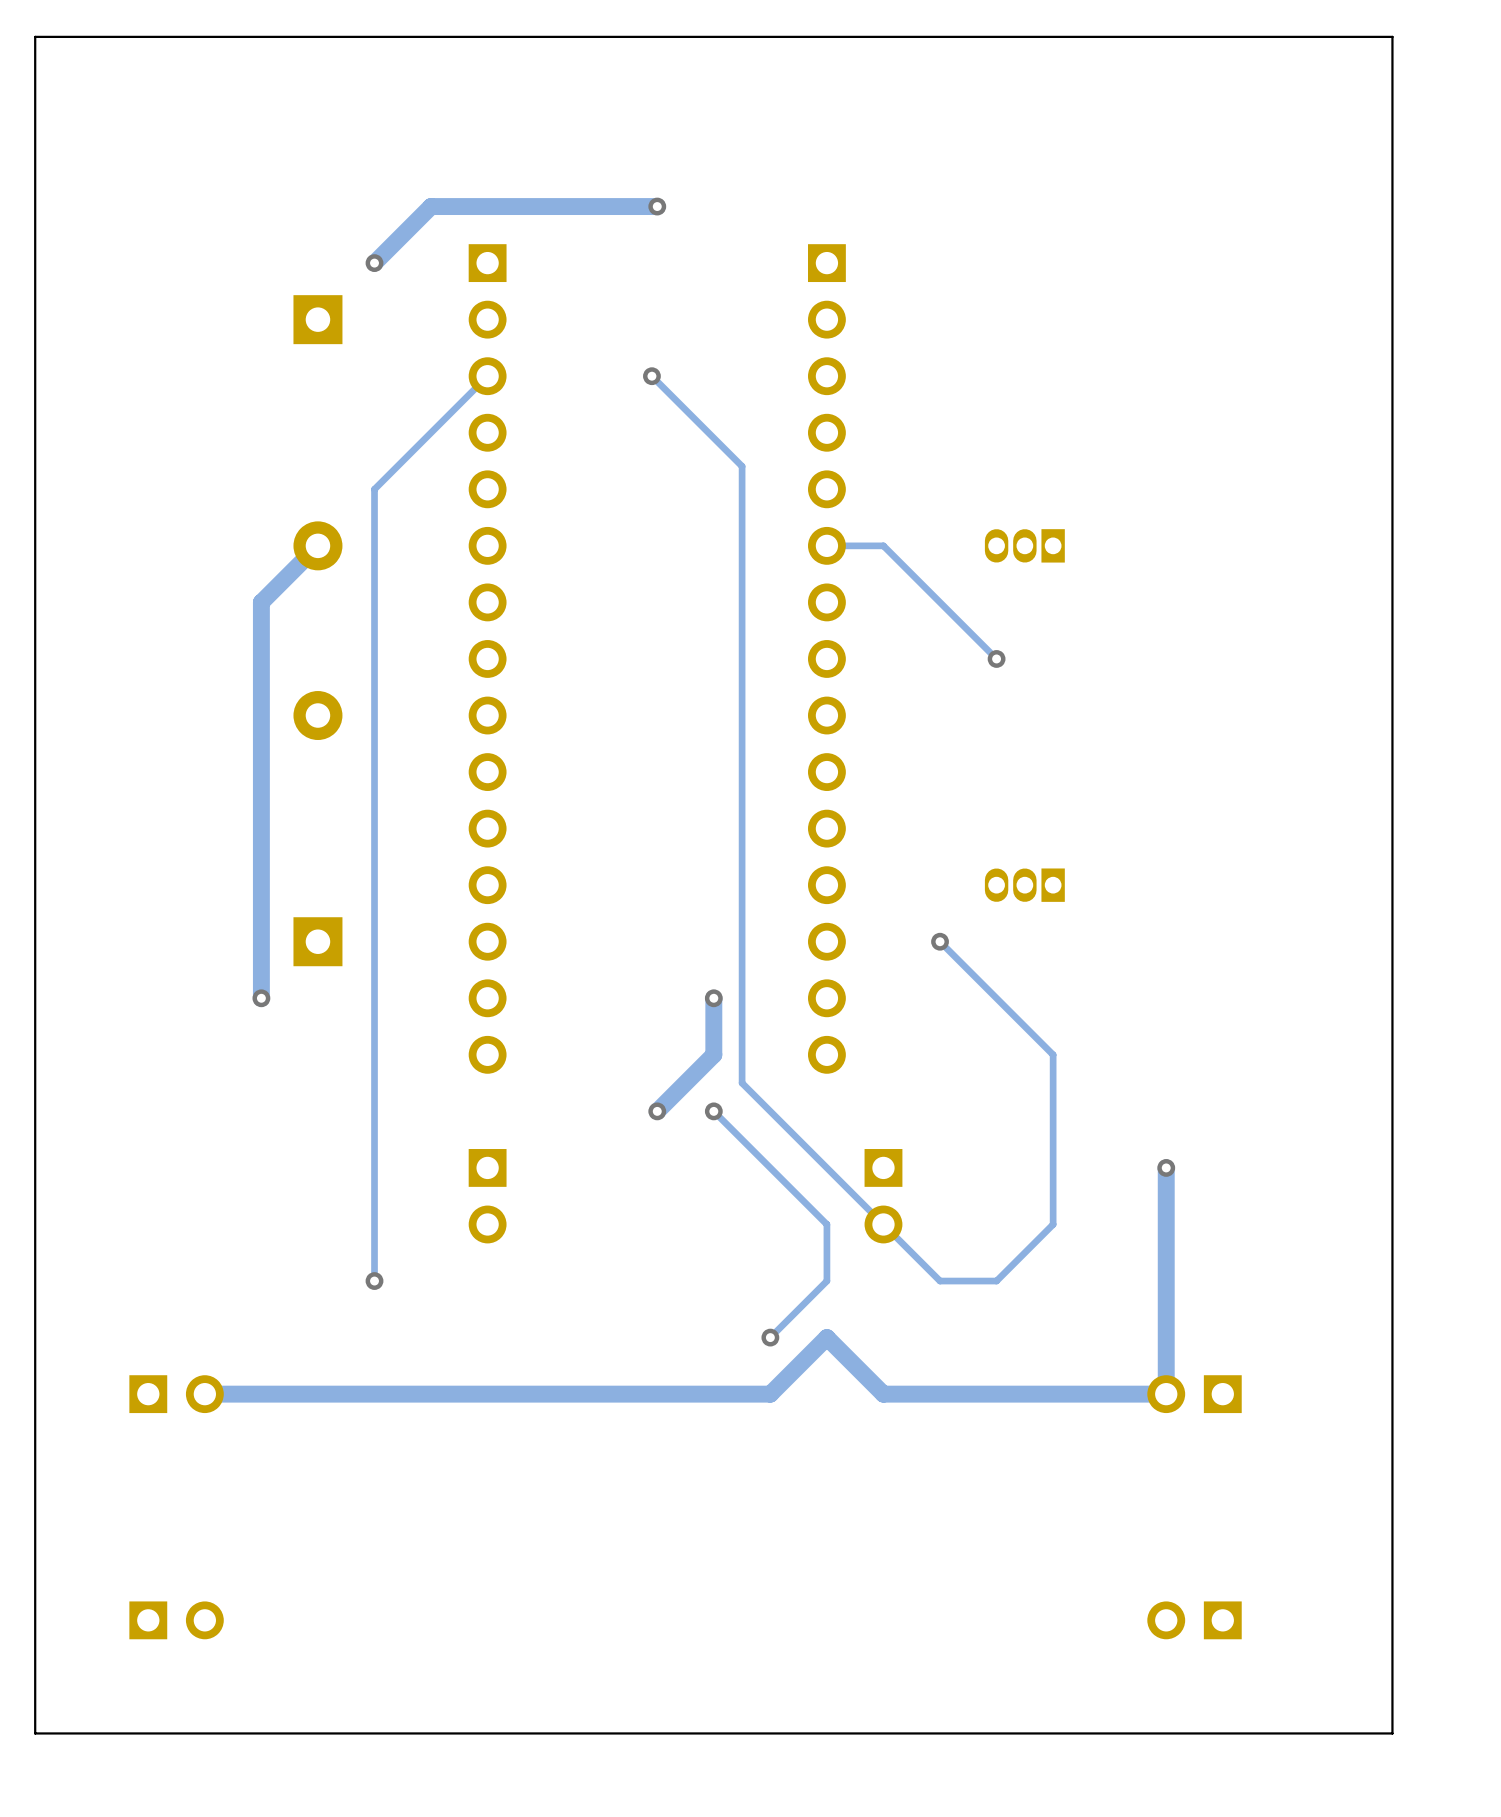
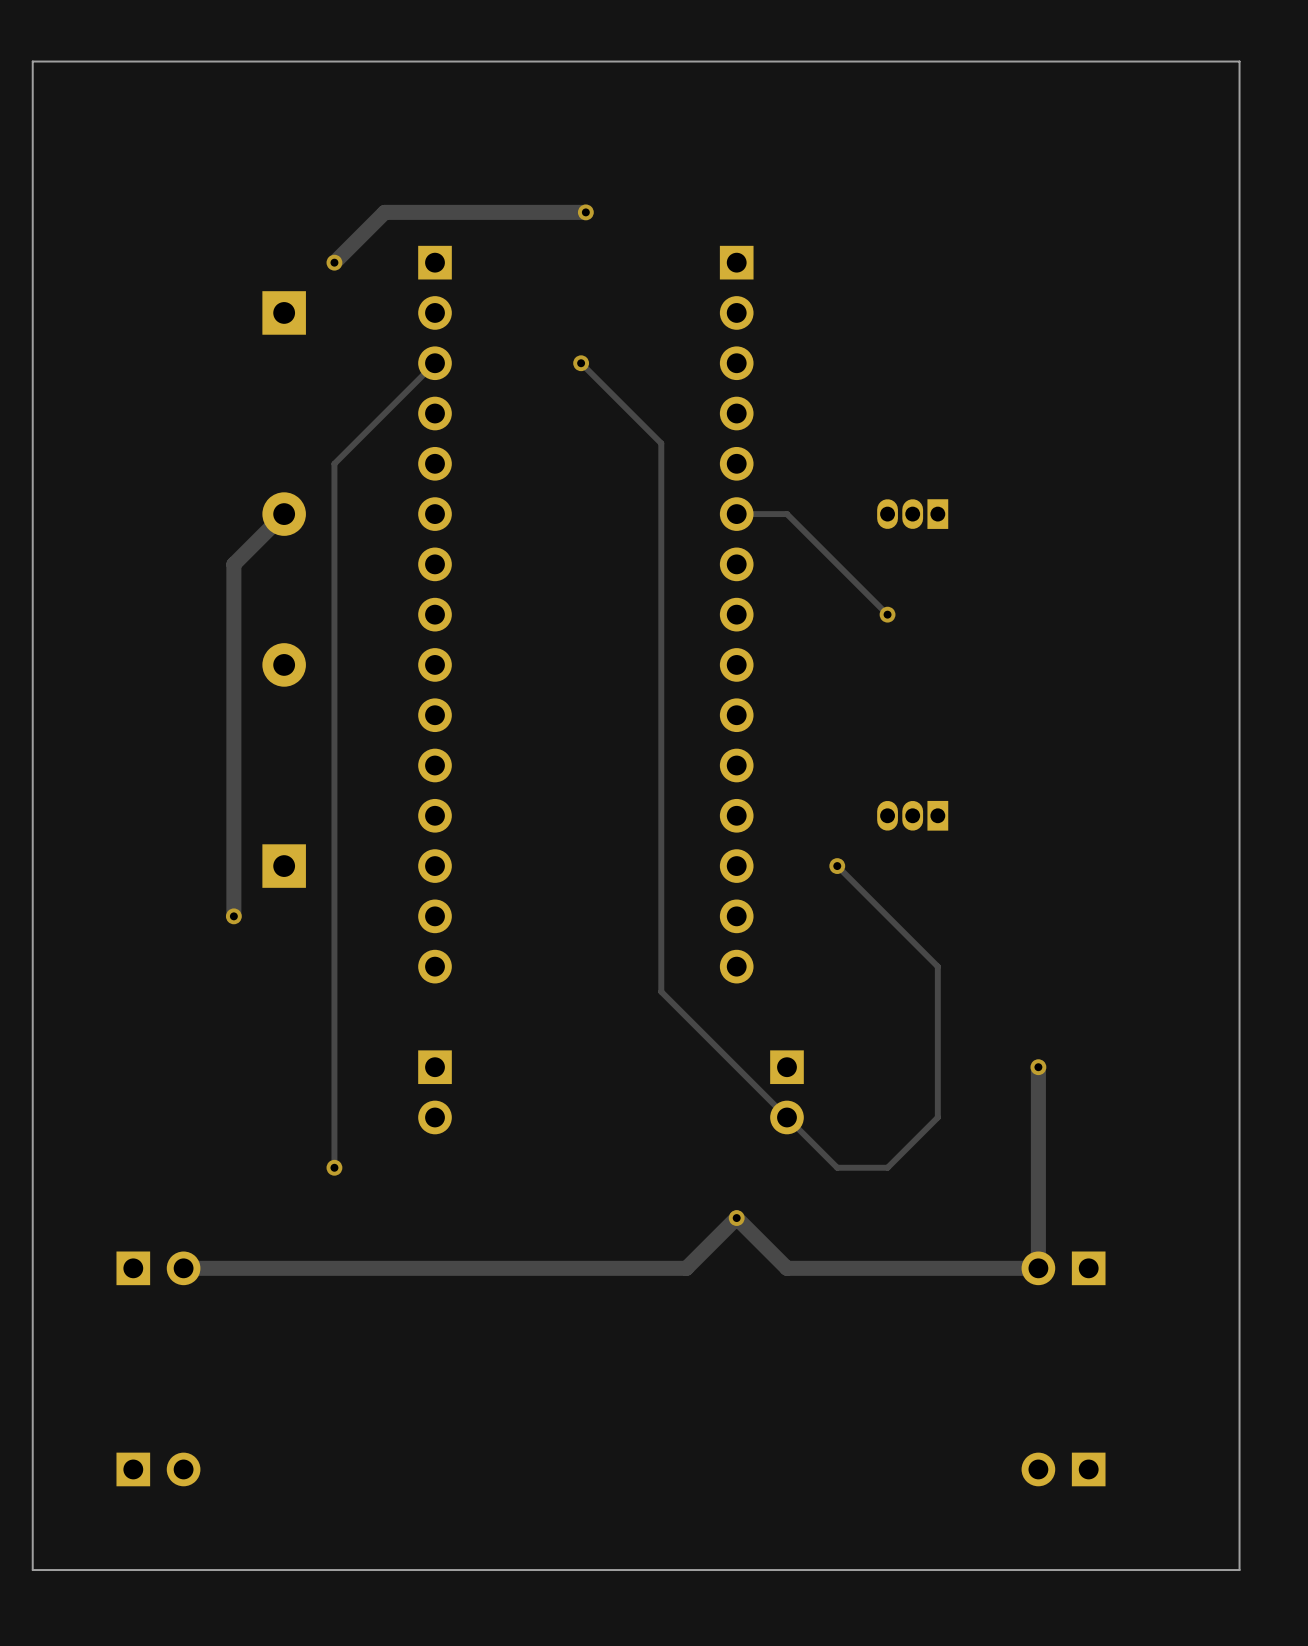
track: (713, 998) (713, 1054) (657, 1111) -> none
via: (713, 998) -> none
via: (657, 1111) -> none
track: (713, 1111) (826, 1224) (826, 1281) (770, 1337) -> none
via: (713, 1111) -> none
via position: (770, 1337) -> (736, 1218)

